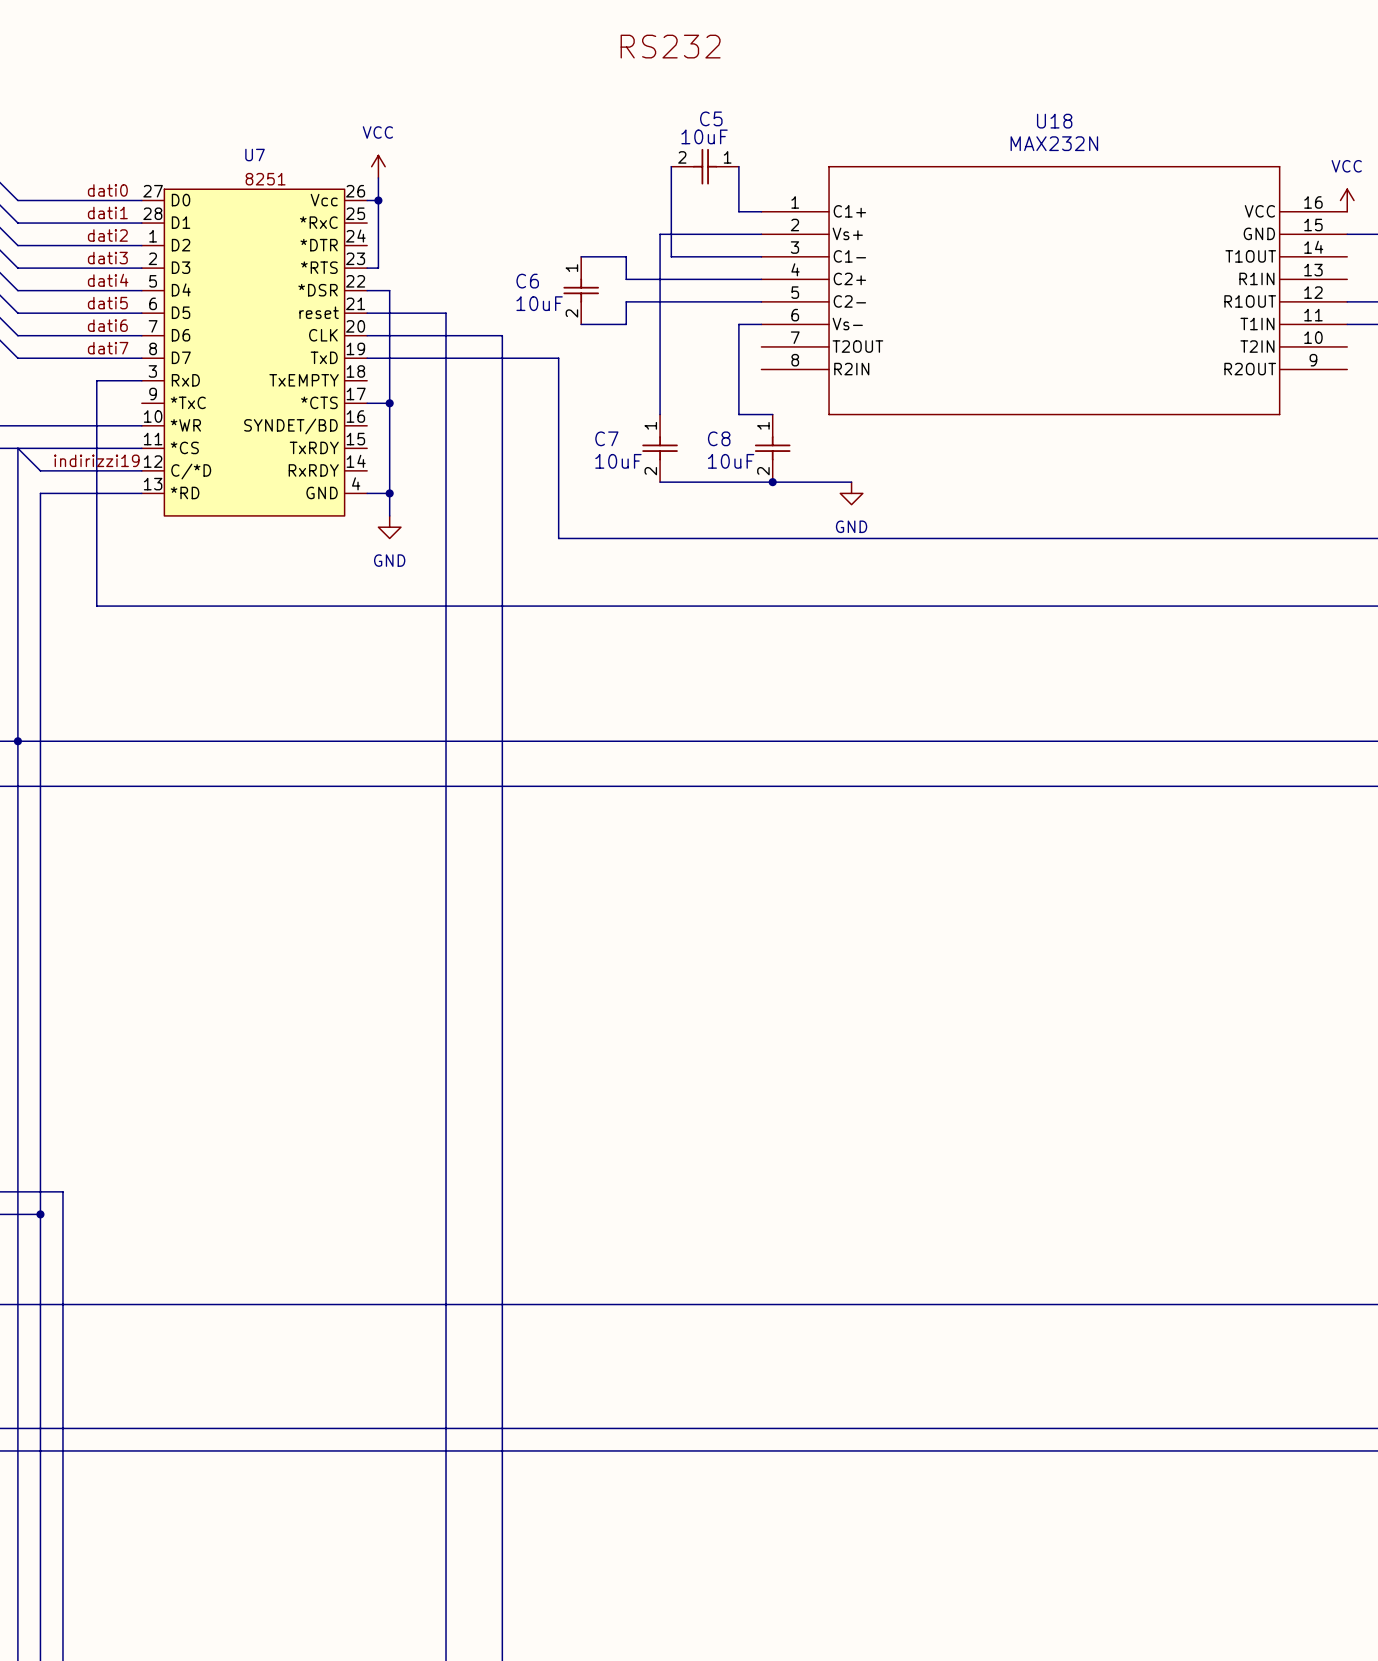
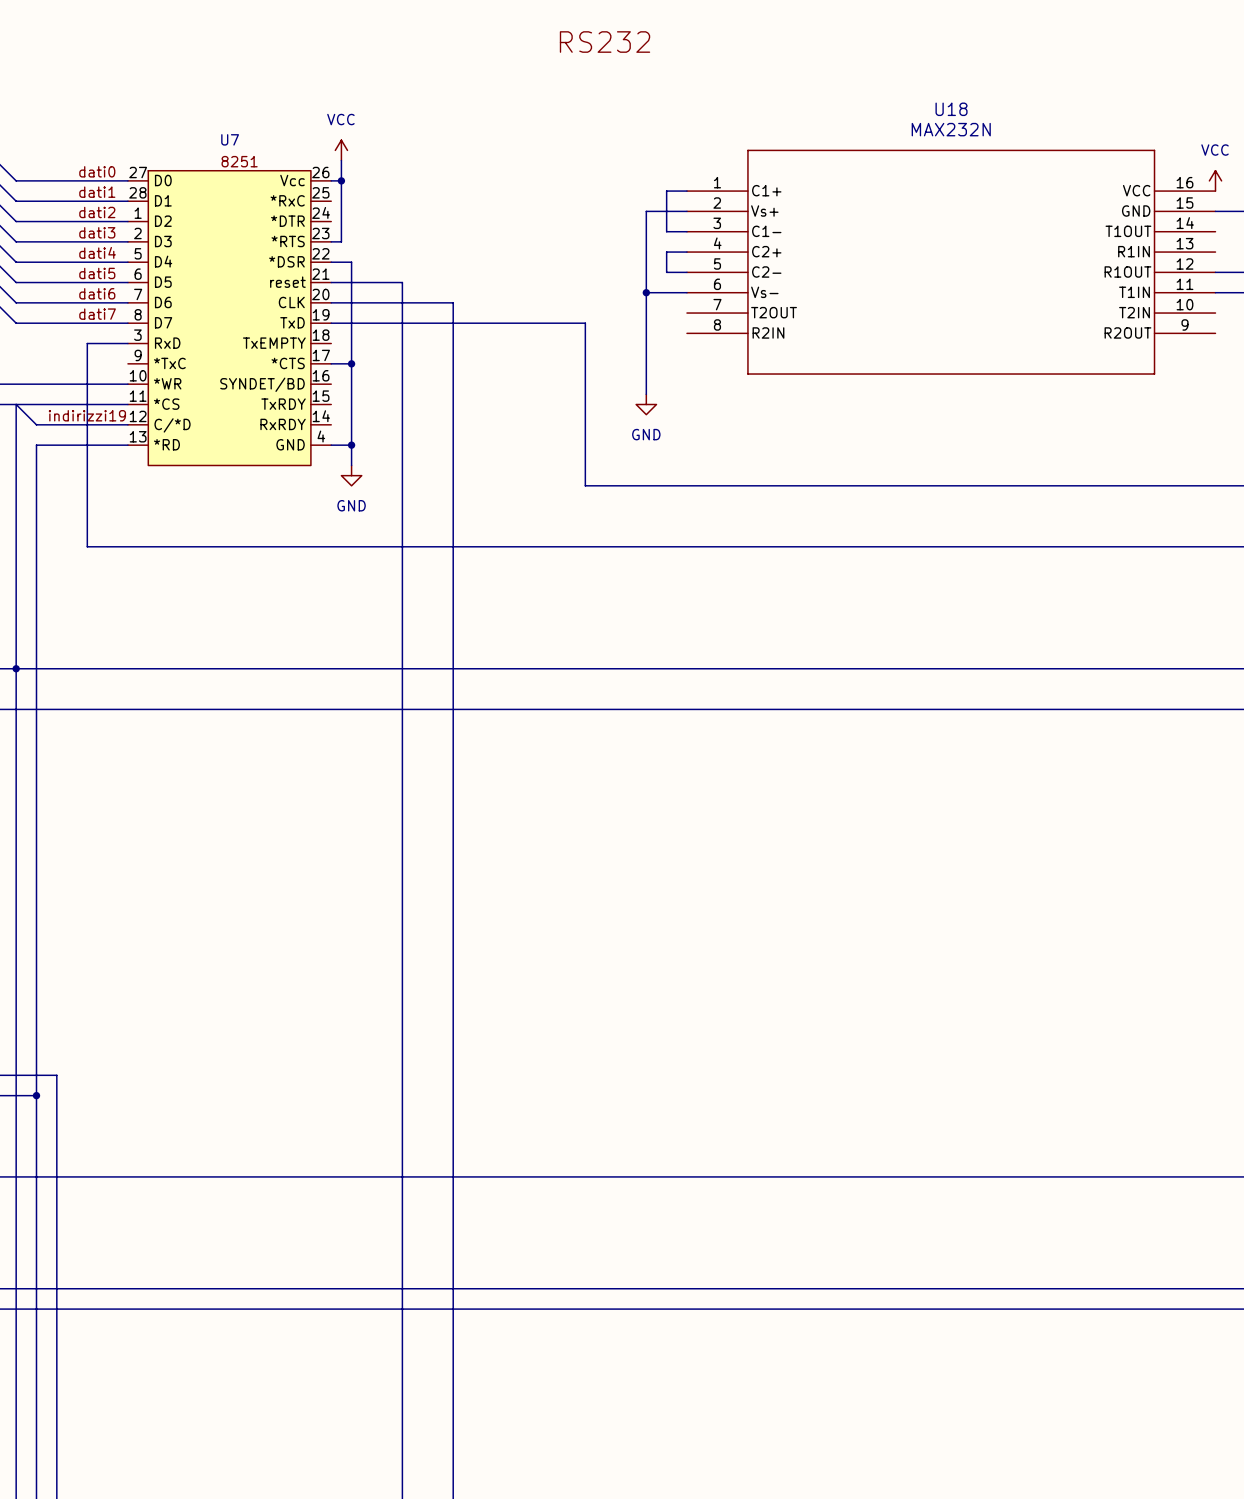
wire: (671, 166) (671, 256) (738, 256) -> (666, 191) (666, 231)
C5: 10uF (705, 166) -> none
wire: (738, 166) (738, 211) -> none
wire: (716, 234) (660, 234) (660, 414) -> (646, 211) (646, 394)
wire: (581, 256) (626, 256) (626, 279) (738, 279) -> (666, 272) (666, 252)
C6: 10uF (581, 290) -> none
wire: (738, 301) (626, 301) (626, 324) (581, 324) -> none
junction: none -> (646, 292)
wire: (738, 324) (738, 414) (772, 414) -> (666, 292) (646, 292)
wire: (558, 358) (558, 538) (648, 538) -> (504, 323) (585, 323) (585, 485)
C7: 10uF (660, 448) -> none
C8: 10uF (772, 448) -> none
wire: (660, 482) (851, 482) -> none
junction: (772, 482) -> none
power symbol position: GND (851, 493) -> GND (646, 404)

